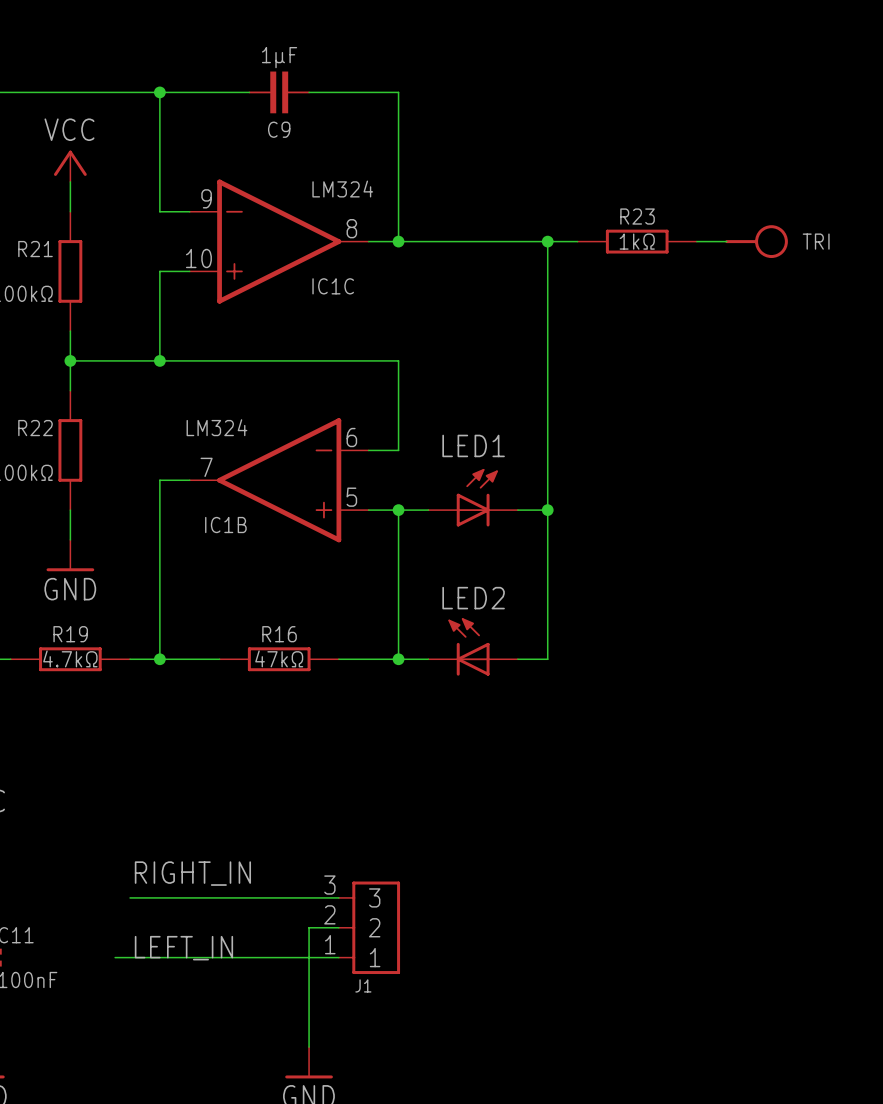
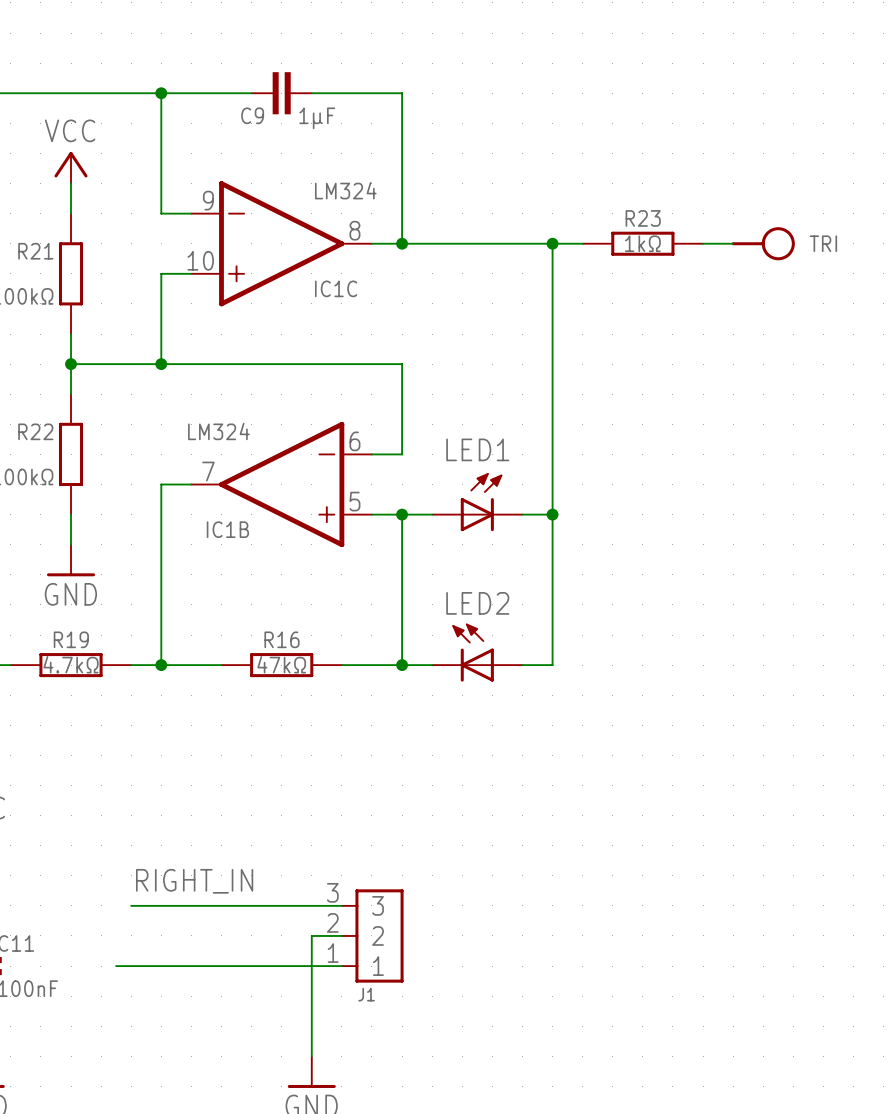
C9 value position: 1μF (279, 57) -> 1μF (317, 118)
C9 name position: C9 (279, 129) -> C9 (252, 115)
label: LEFT_IN (183, 948) -> none

